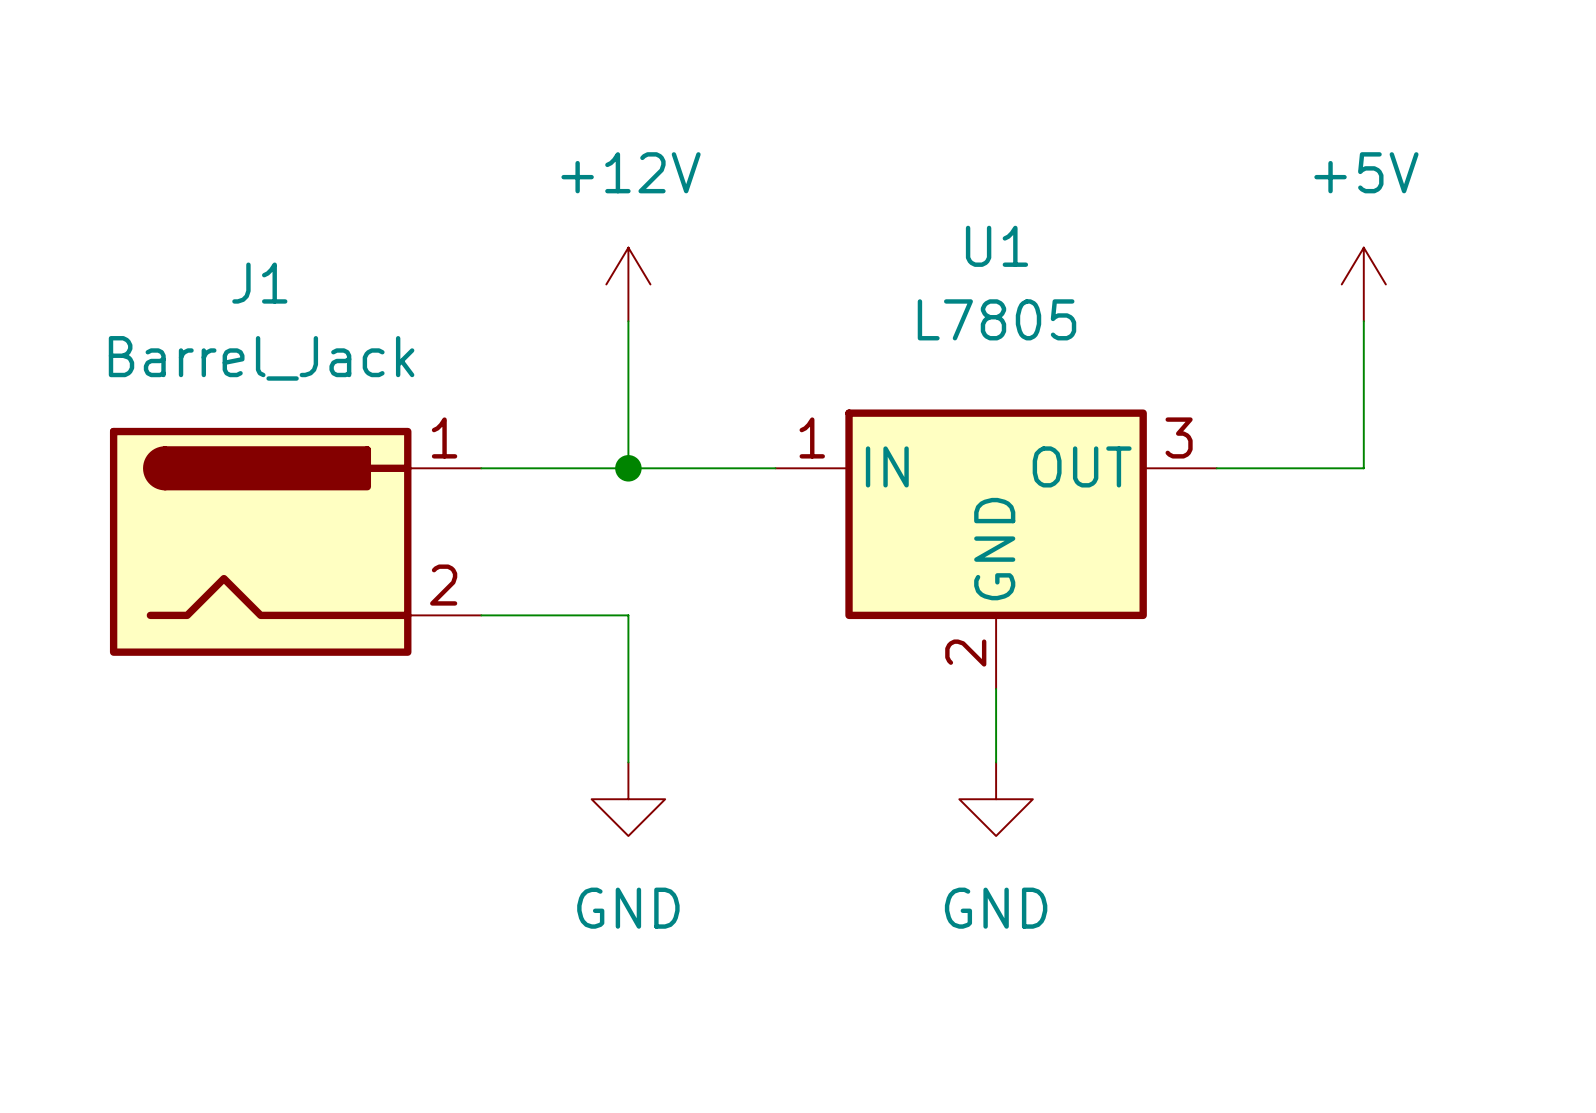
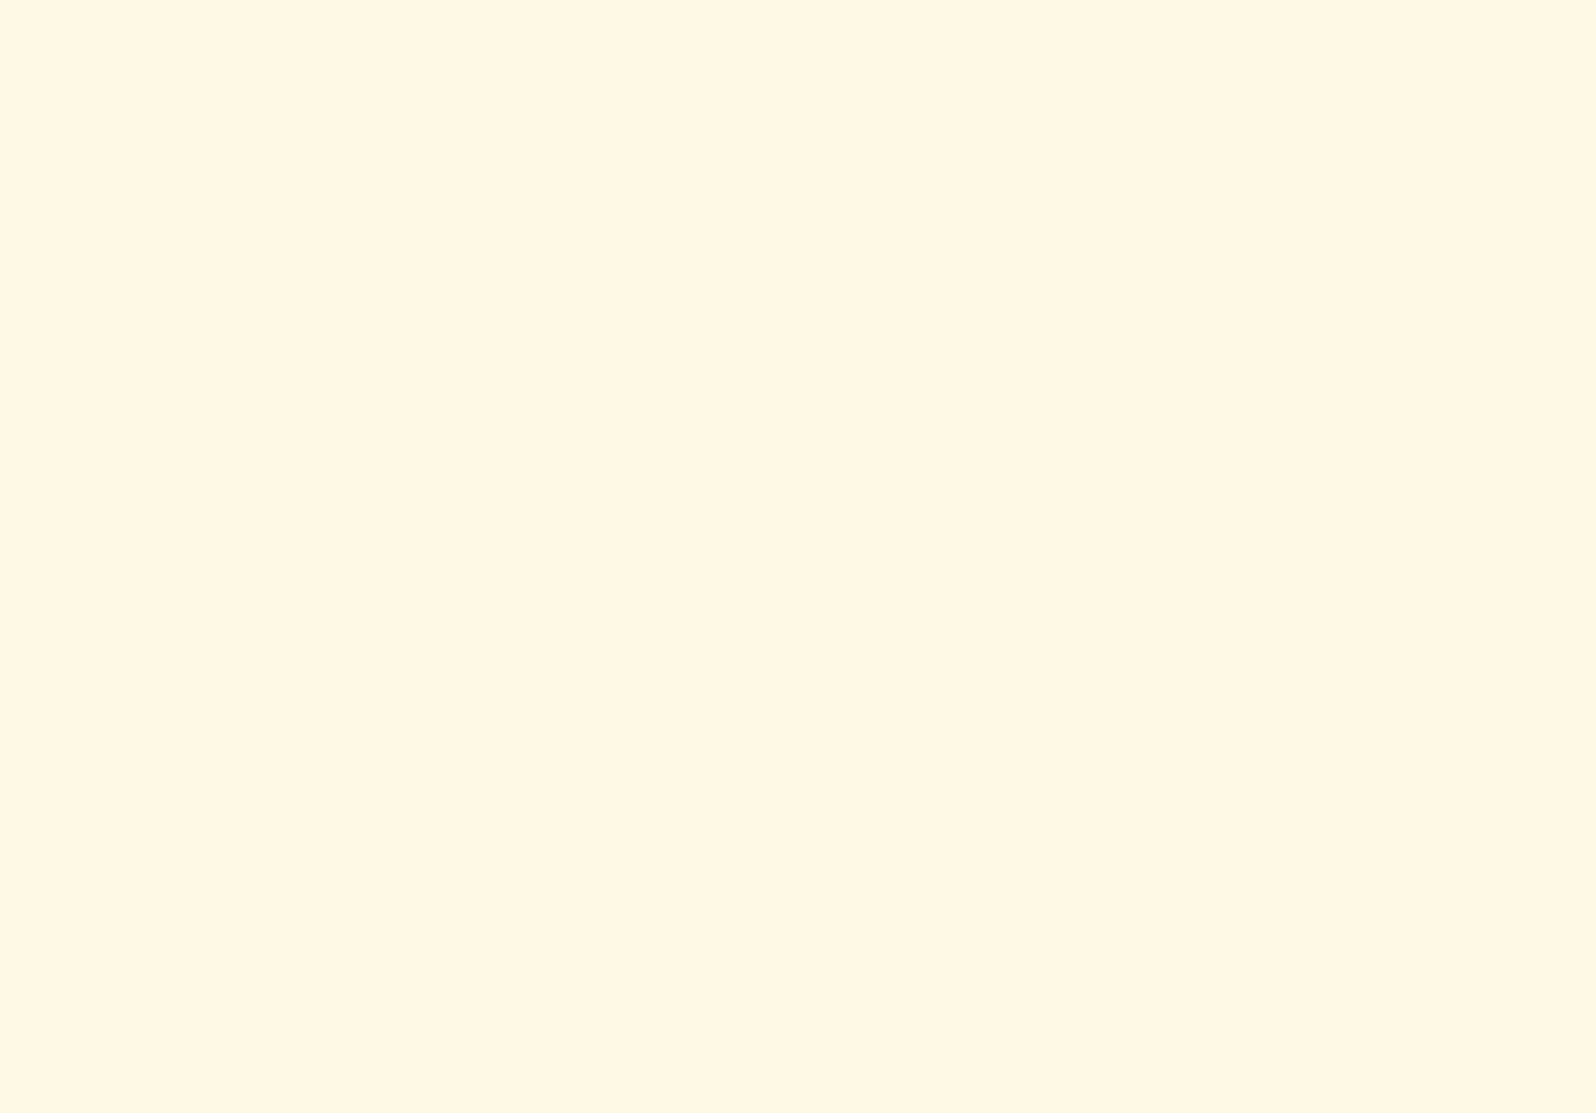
power symbol: +12V (628, 284) -> none
power symbol: +5V (1363, 284) -> none
wire: (628, 321) (628, 468) -> none
wire: (1363, 321) (1363, 468) (1216, 468) -> none
wire: (481, 468) (775, 468) -> none
junction: (628, 468) -> none
J1: Barrel_Jack (295, 541) -> none
U1: L7805 (996, 549) -> none
wire: (481, 615) (628, 615) (628, 762) -> none
wire: (996, 688) (996, 762) -> none
power symbol: GND (628, 799) -> none
power symbol: GND (996, 799) -> none

